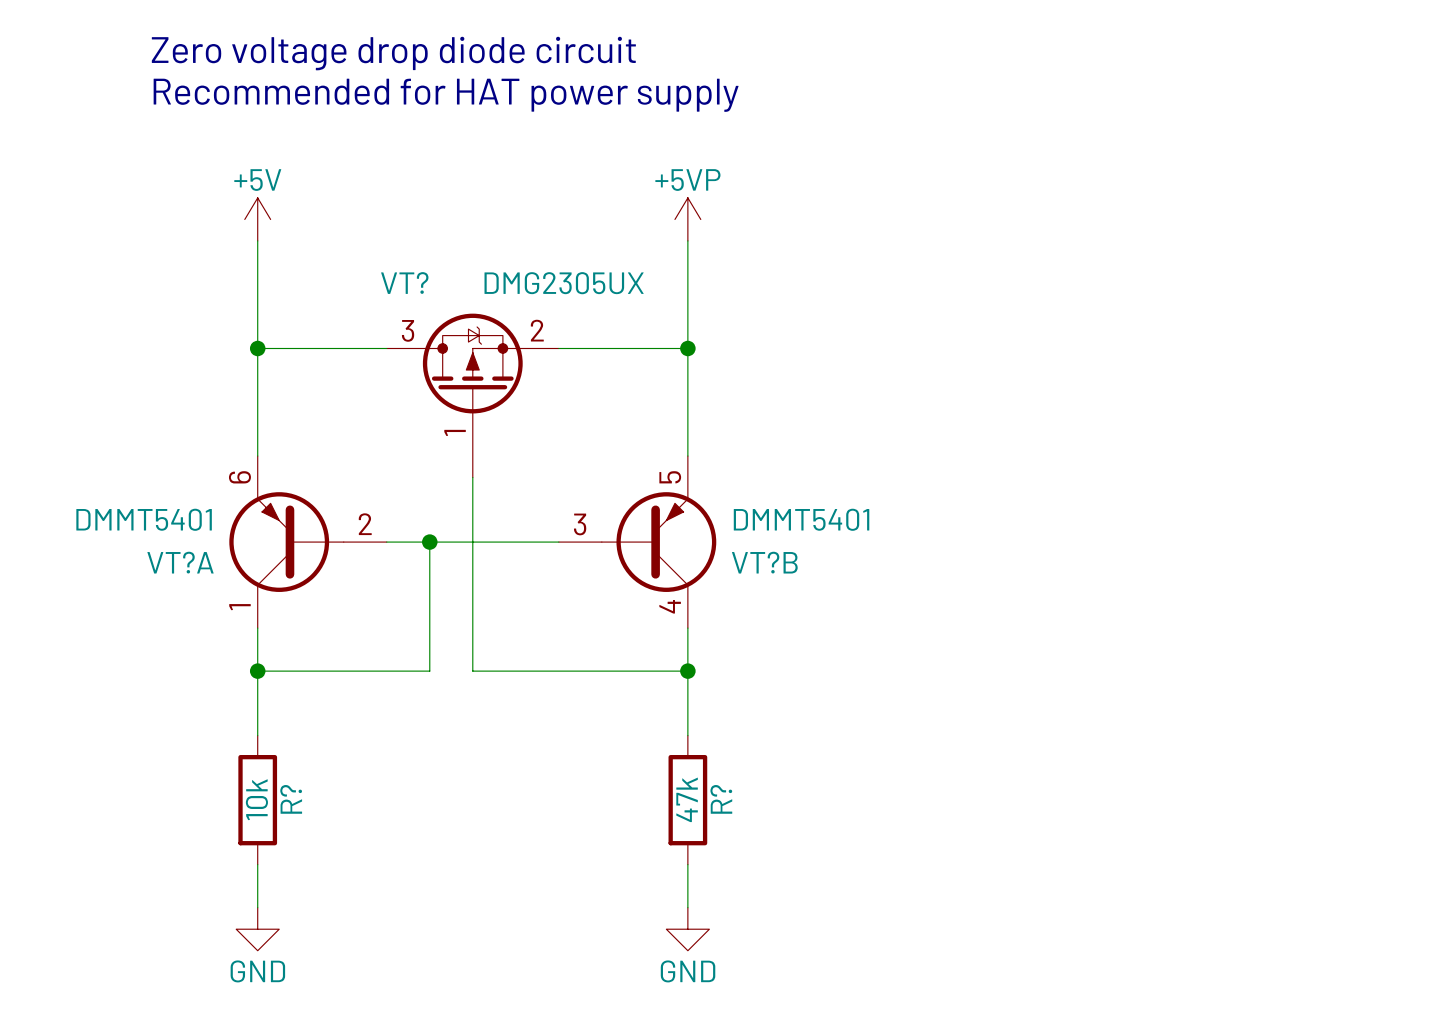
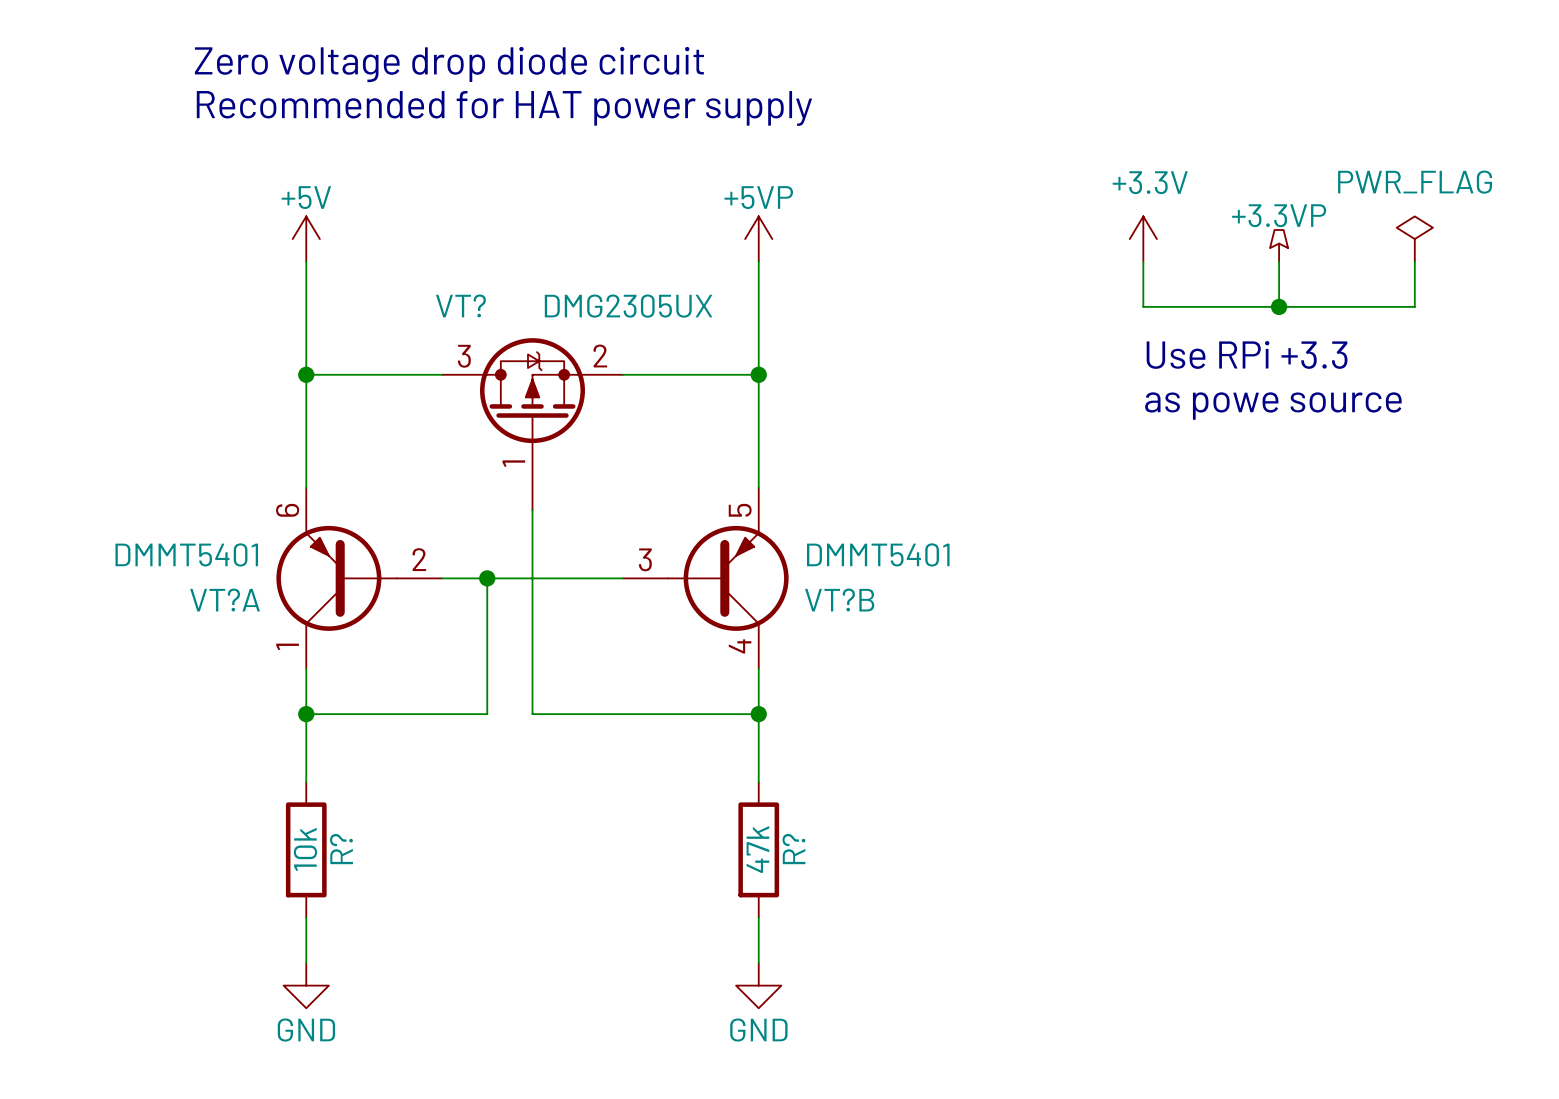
power symbol: none -> +3.3V (1143, 239)
power symbol: none -> PWR_FLAG (1414, 239)
power symbol: none -> +3.3VP (1279, 245)
wire: none -> (1143, 261) (1143, 306) (1414, 306) (1414, 261)
wire: none -> (1279, 261) (1279, 306)
junction: none -> (1279, 306)
text: none -> Use RPi +3.3 (1247, 354)
text: none -> as powe source (1273, 406)

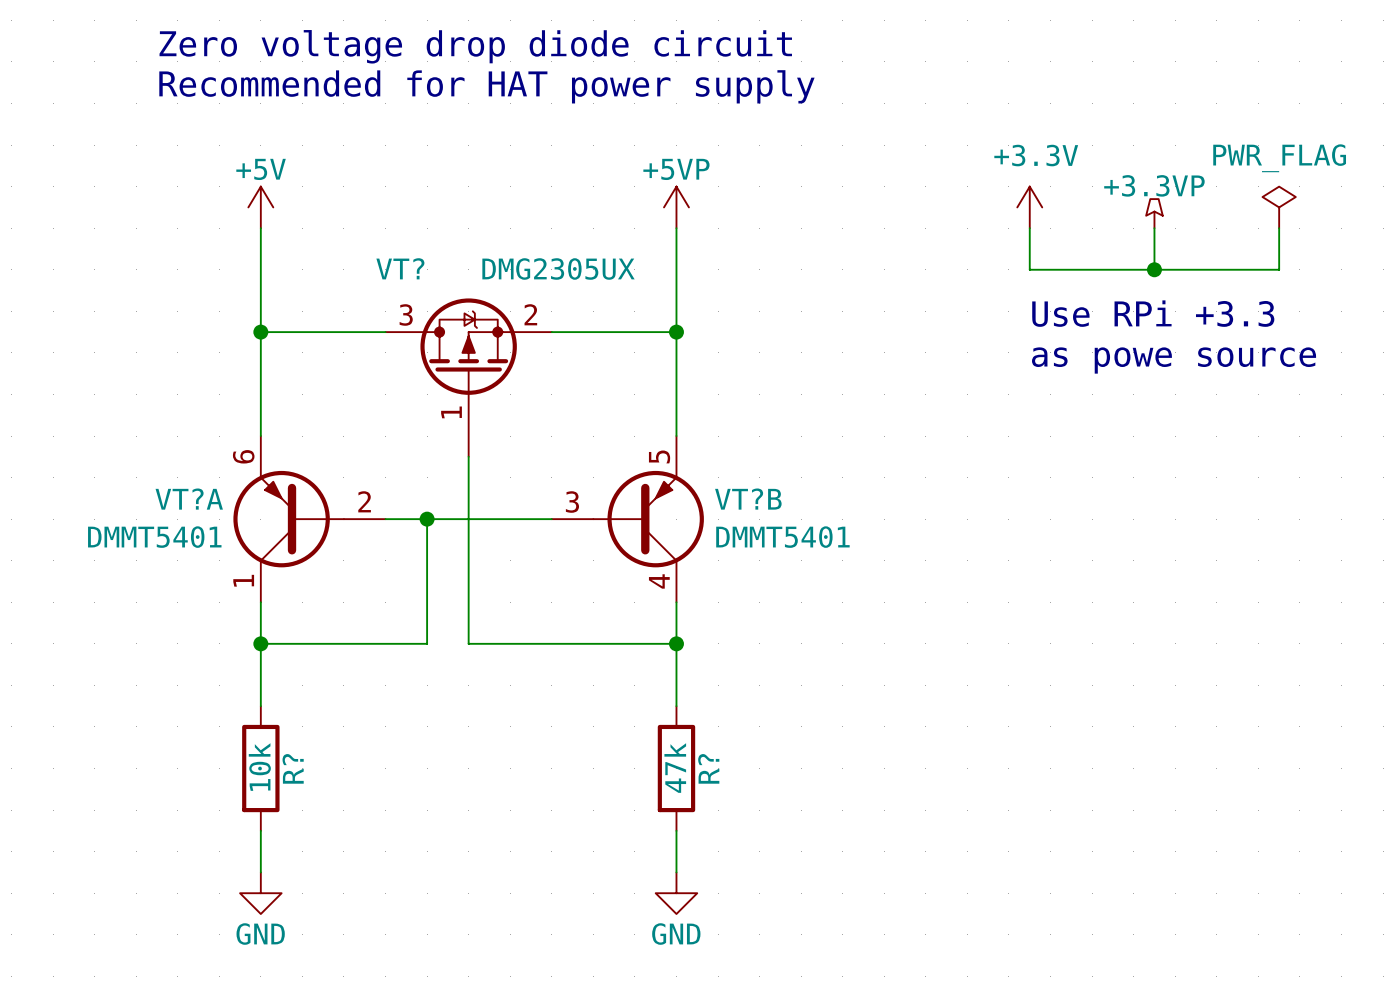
VT?A value position: DMMT5401 (186, 554) -> DMMT5401 (154, 537)
VT?B value position: DMMT5401 (878, 554) -> DMMT5401 (782, 537)
VT?A name position: VT?A (225, 600) -> VT?A (189, 499)
VT?B name position: VT?B (839, 600) -> VT?B (748, 499)

